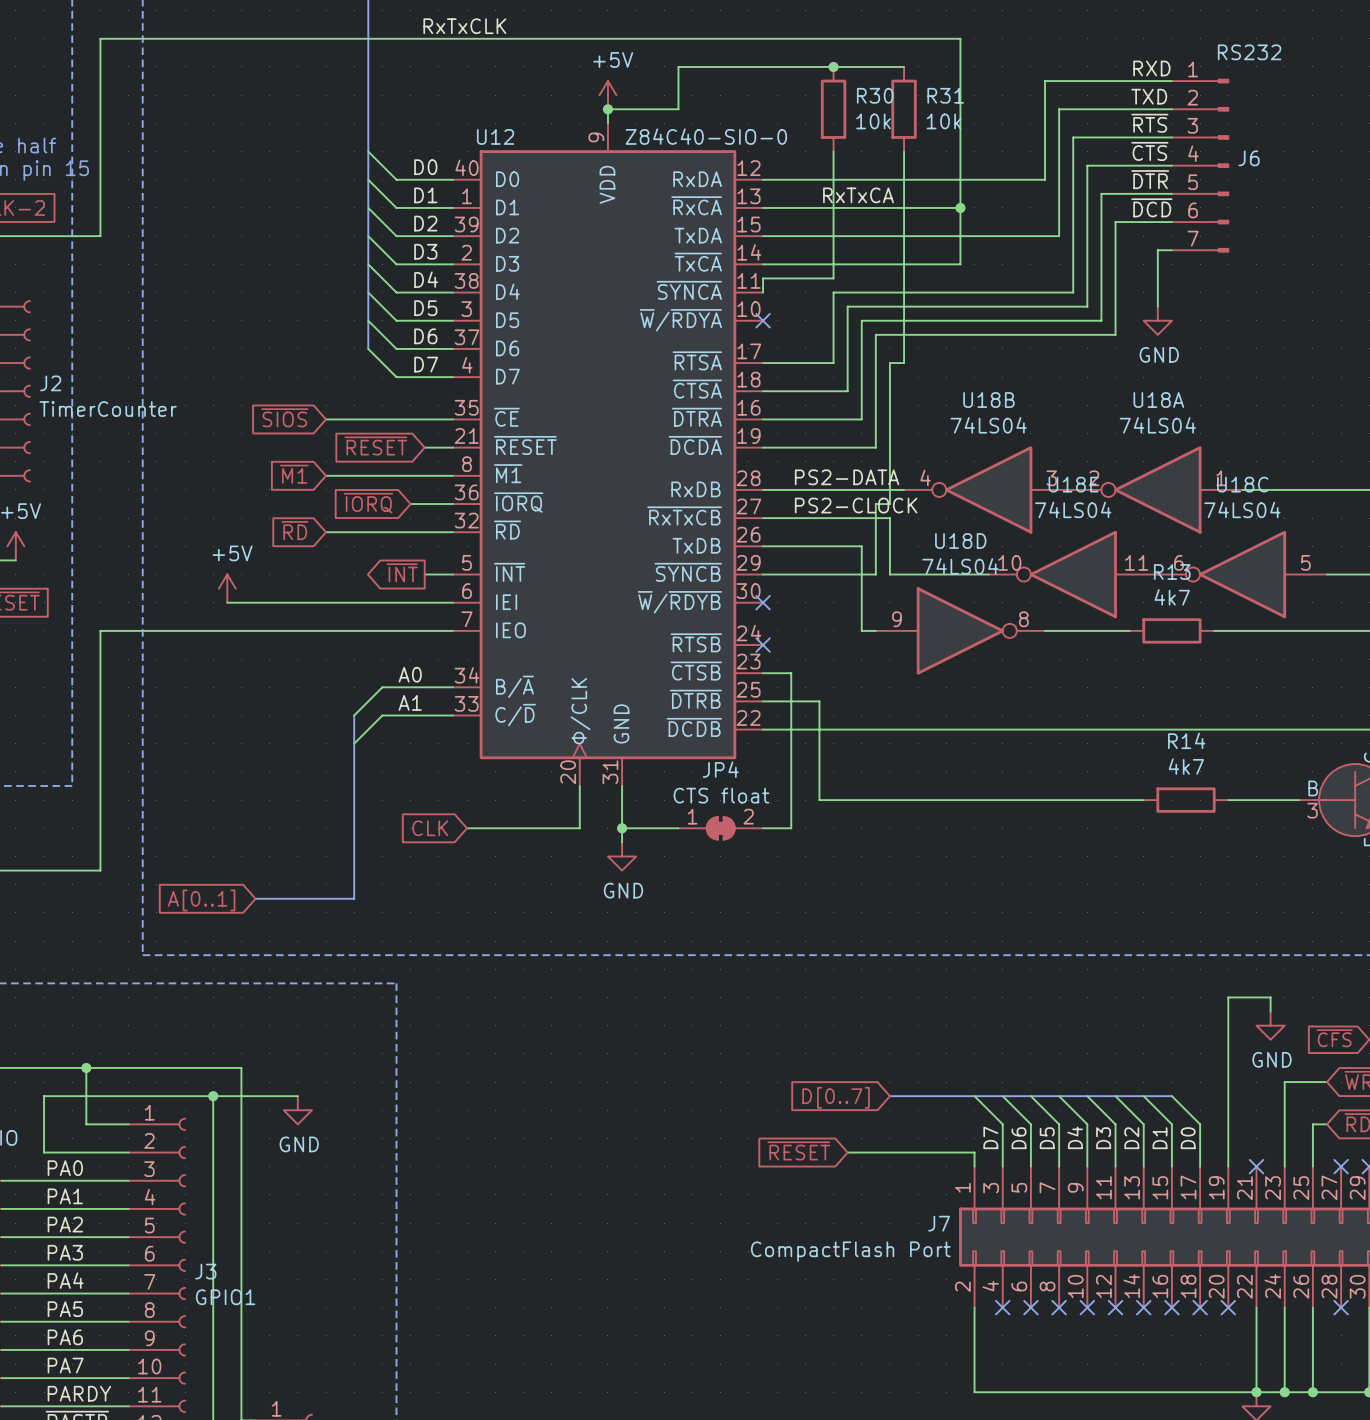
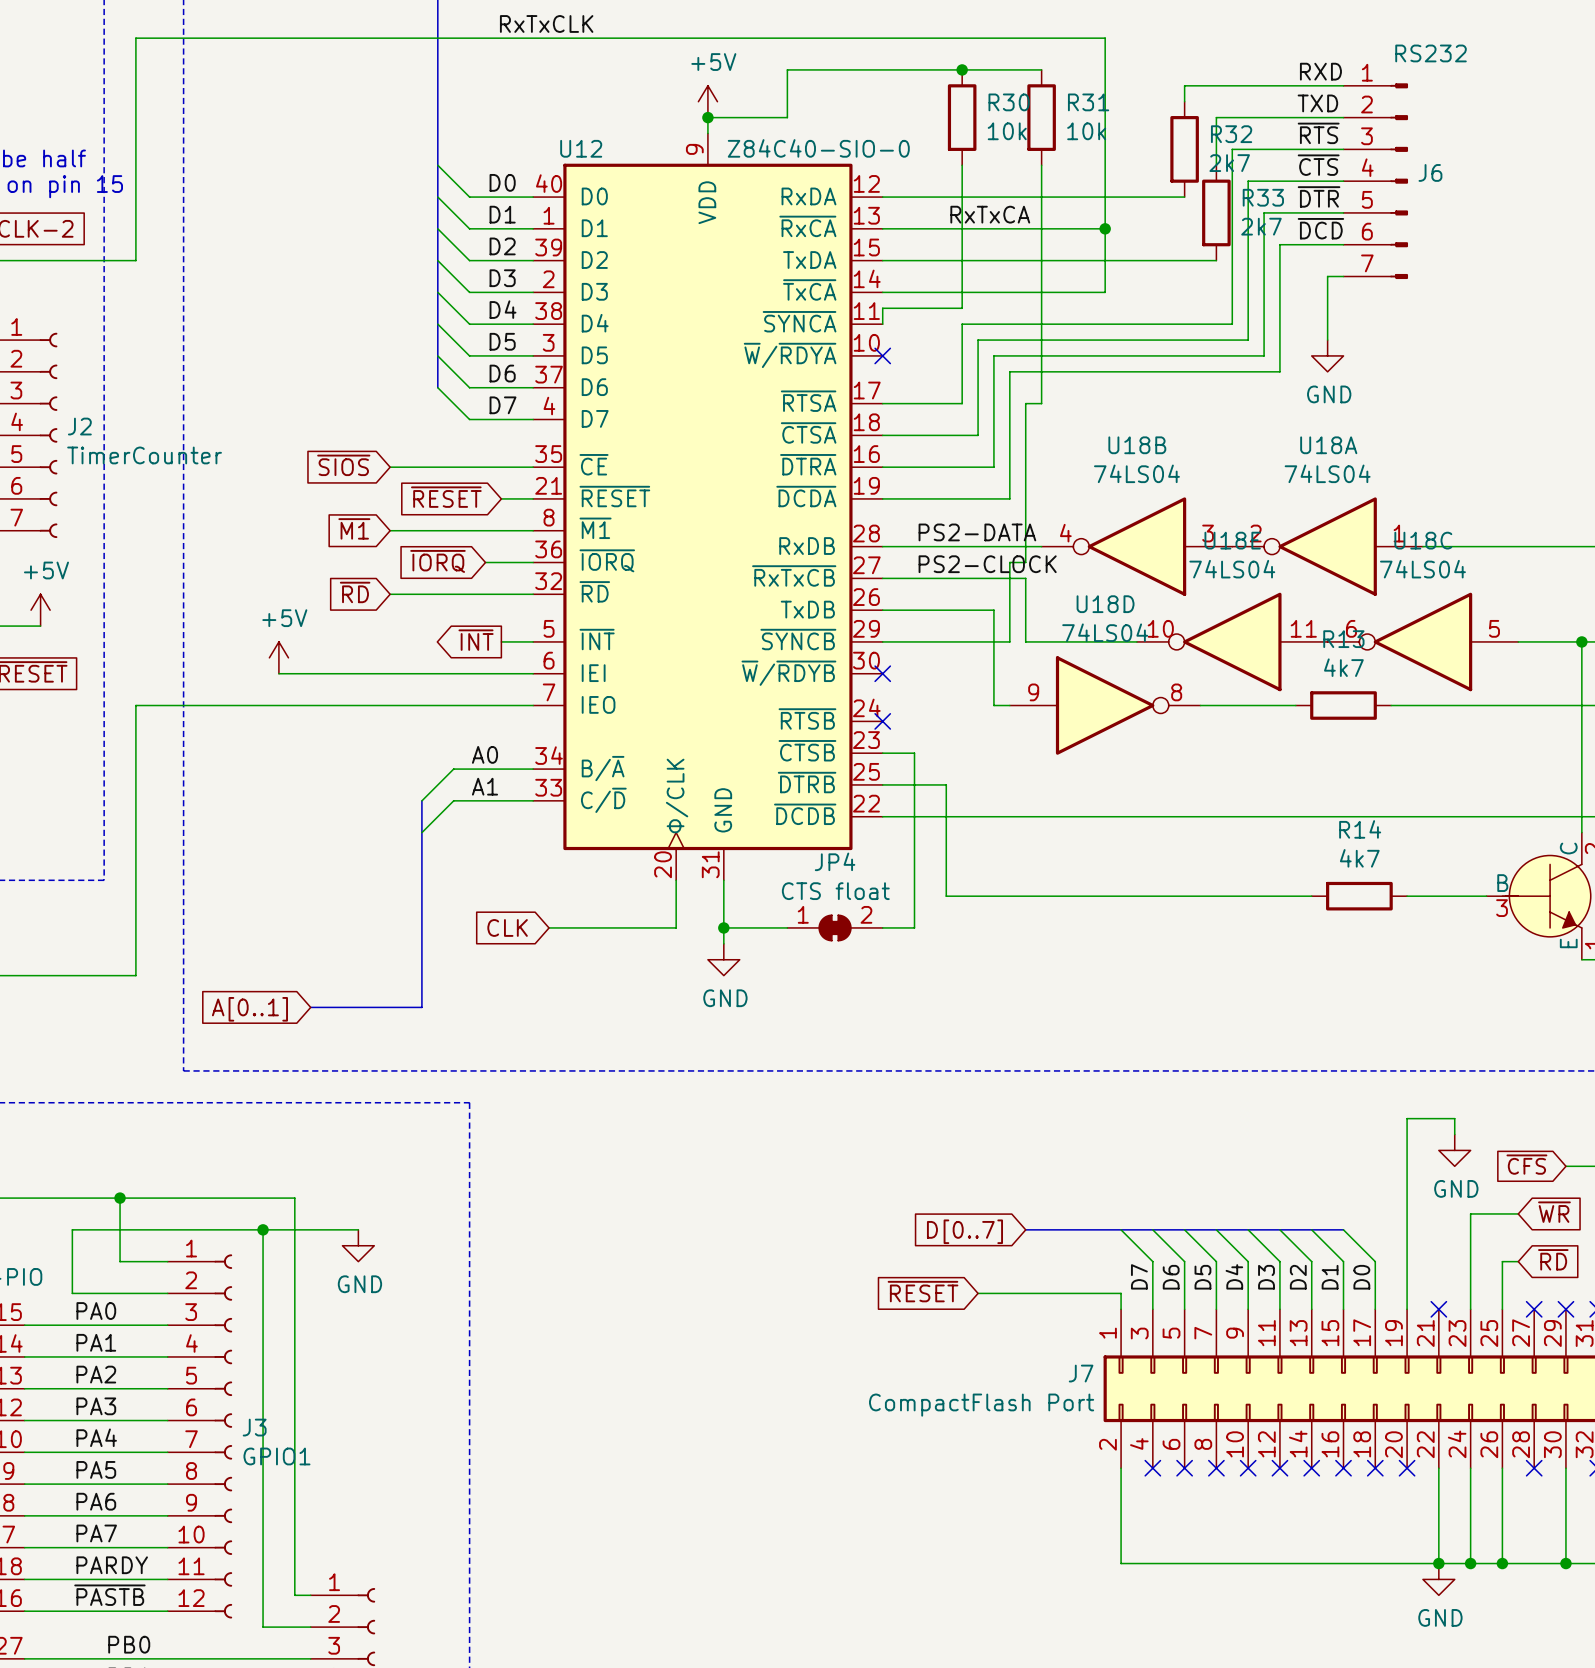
wire: (1045, 81) (1045, 179) (1030, 179) -> (1200, 85) (1184, 85) (1184, 101)
R32: none -> 2k7 (1184, 149)
wire: (1059, 151) (1059, 236) -> none
R33: none -> 2k7 (1216, 212)

